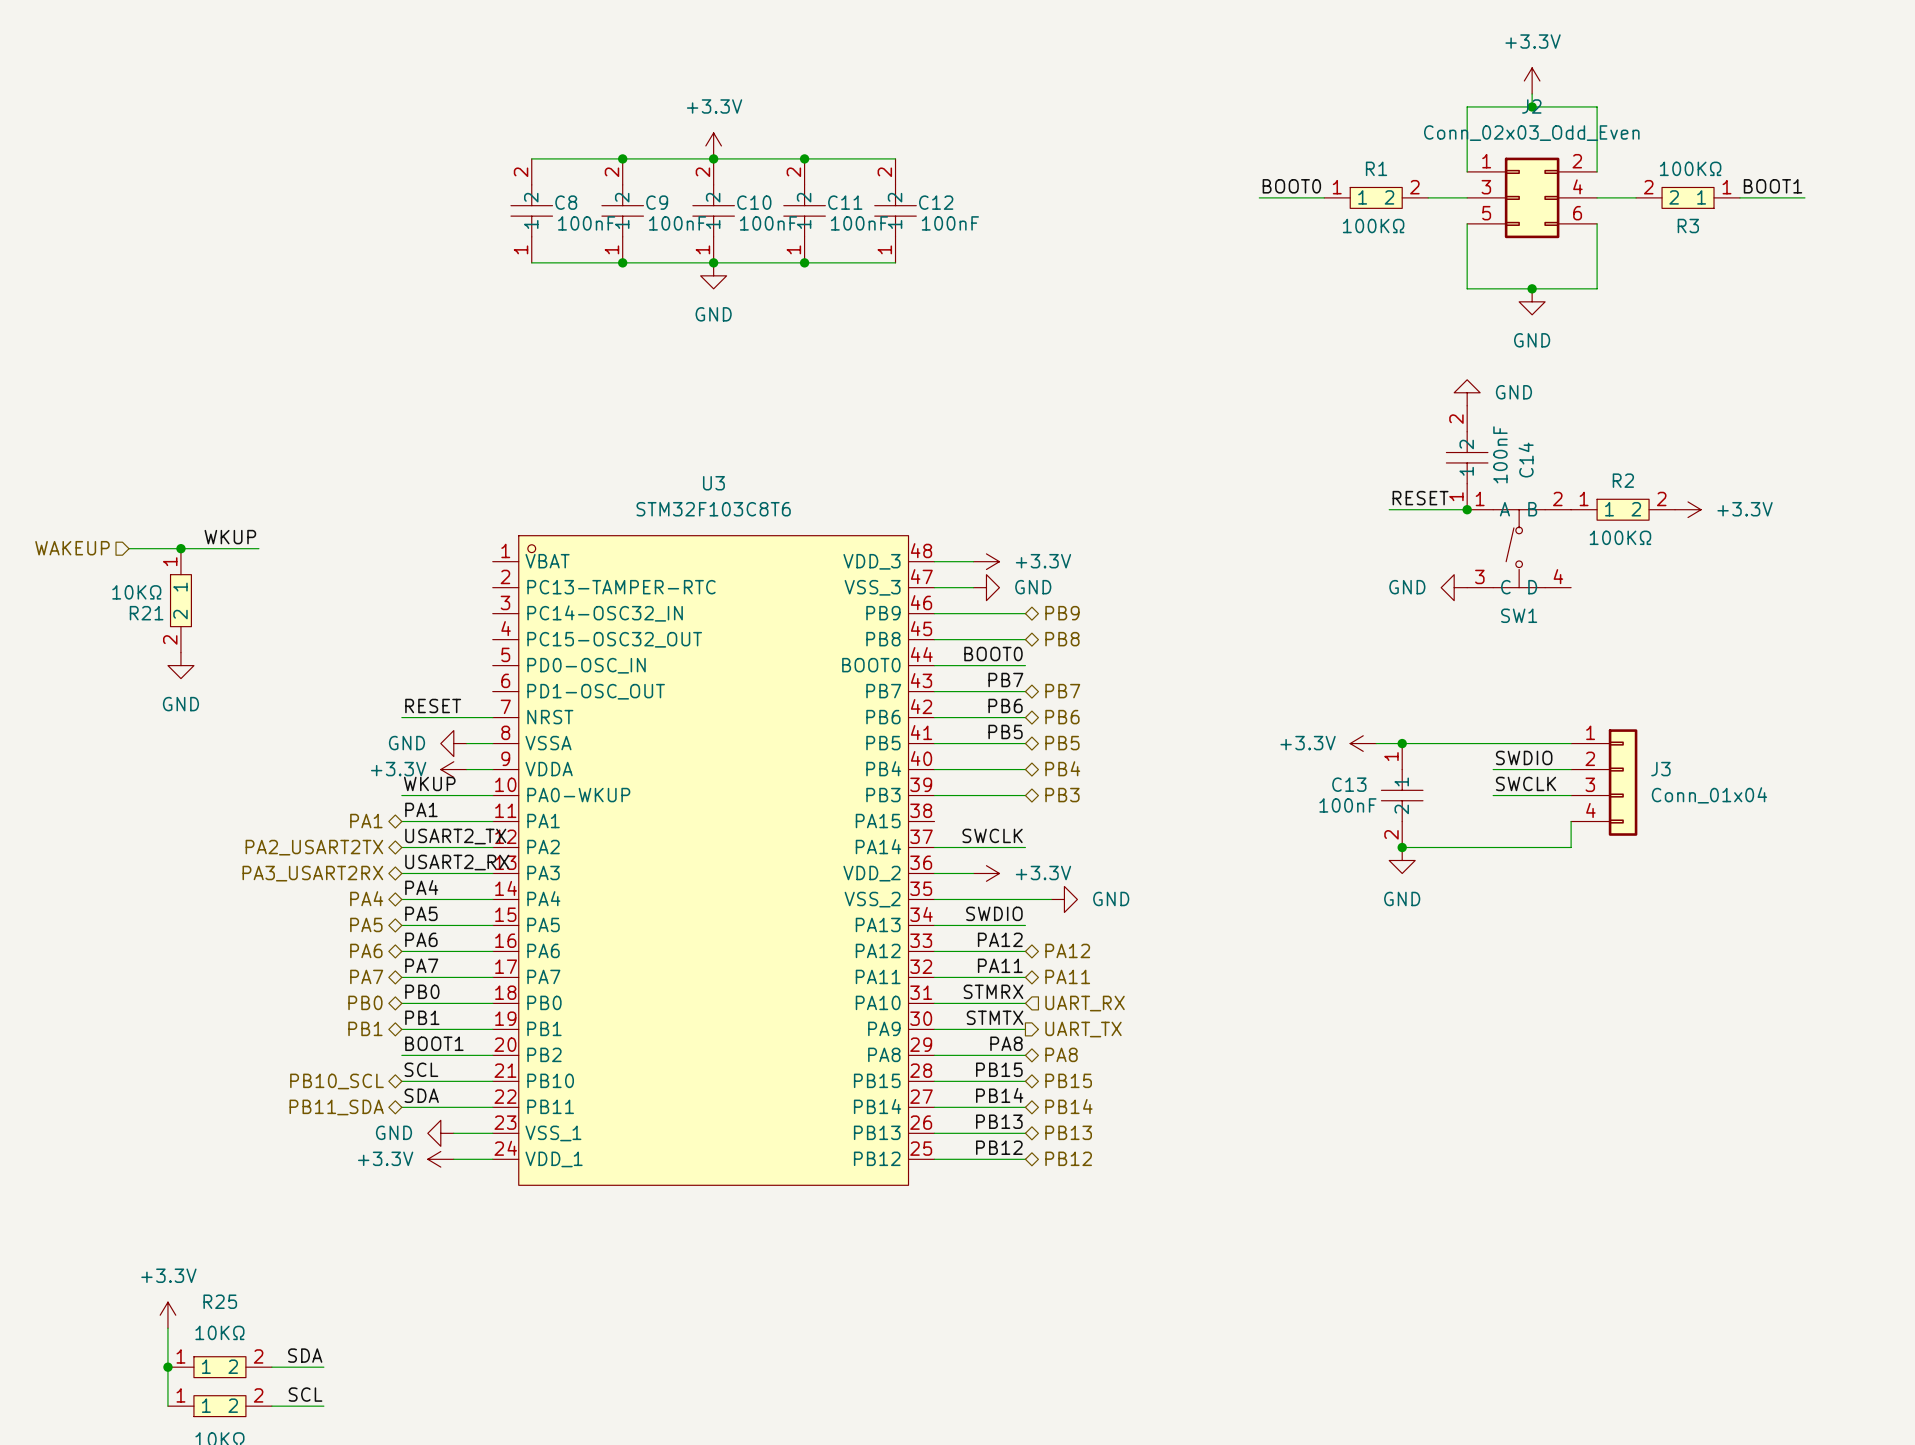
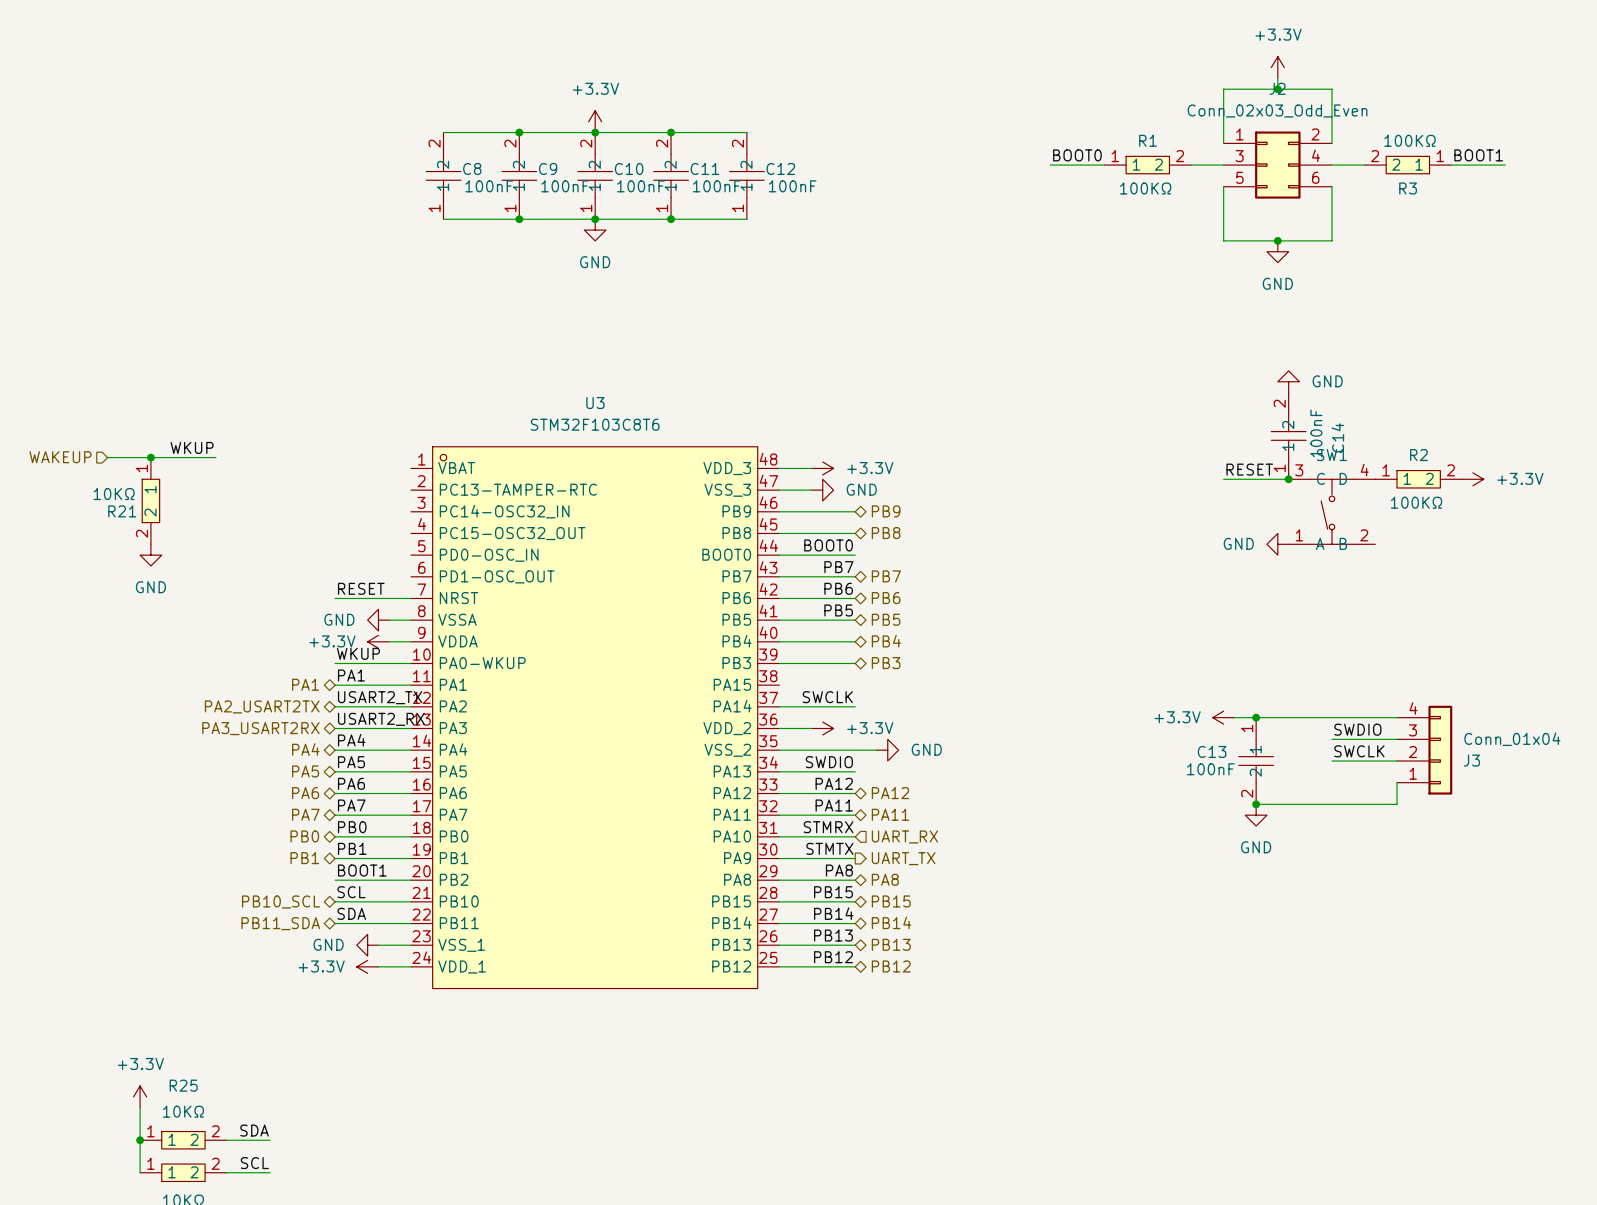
power symbol: GND (1467, 392) -> none
C14 position: (1467, 457) -> (1288, 435)
power symbol: none -> GND (1288, 381)
label position: RESET (1420, 498) -> RESET (1249, 469)
wire: (1389, 509) (1467, 509) -> (1223, 479) (1288, 479)
junction: (1467, 509) -> none
R2 position: (1623, 509) -> (1418, 479)
power symbol position: +3.3V (1688, 509) -> +3.3V (1472, 479)
SW1 flip: as is (1519, 548) -> up-down (1331, 511)
SW1 position: (1519, 548) -> (1331, 511)
junction: none -> (1288, 479)
power symbol: GND (1454, 587) -> none
power symbol: none -> GND (1277, 544)
power symbol position: +3.3V (1363, 743) -> +3.3V (1223, 717)
wire: (1376, 743) (1571, 743) -> (1234, 717) (1397, 717)
junction: (1402, 743) -> none
label position: SWDIO (1524, 757) -> SWDIO (1357, 729)
wire: (1493, 769) (1571, 769) -> (1331, 739) (1397, 739)
J3 position: (1604, 782) -> (1424, 750)
J3 flip: as is (1623, 782) -> up-down (1440, 750)
label position: SWCLK (1526, 783) -> SWCLK (1359, 751)
C13 position: (1402, 795) -> (1256, 761)
wire: (1493, 795) (1571, 795) -> (1331, 761) (1397, 761)
wire: (1571, 821) (1571, 847) (1402, 847) -> (1397, 782) (1397, 804) (1256, 804)
junction: (1402, 847) -> none
power symbol: GND (1402, 860) -> none
junction: none -> (1256, 717)
junction: none -> (1256, 804)
power symbol: none -> GND (1256, 815)

